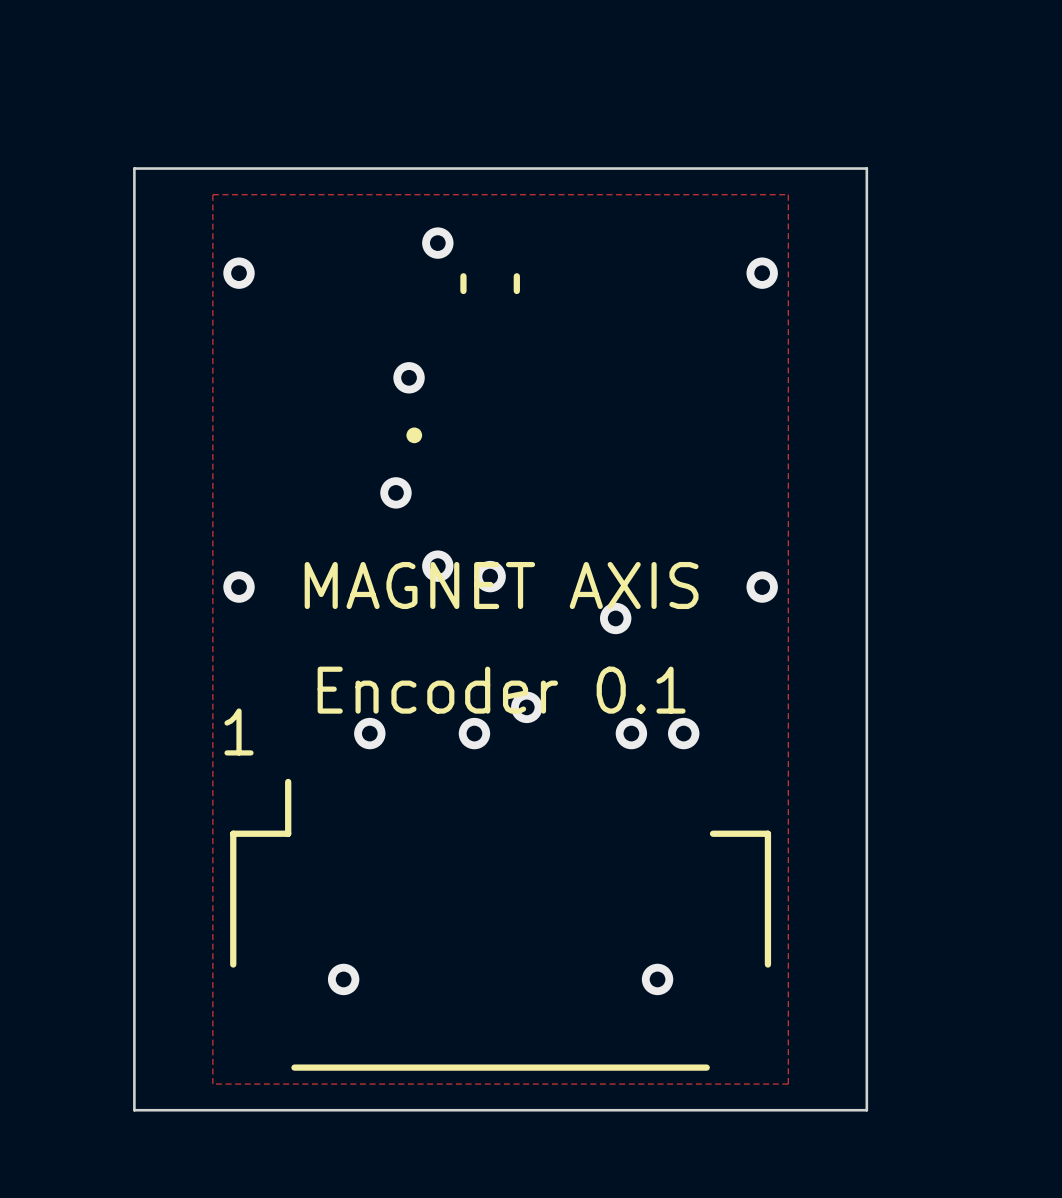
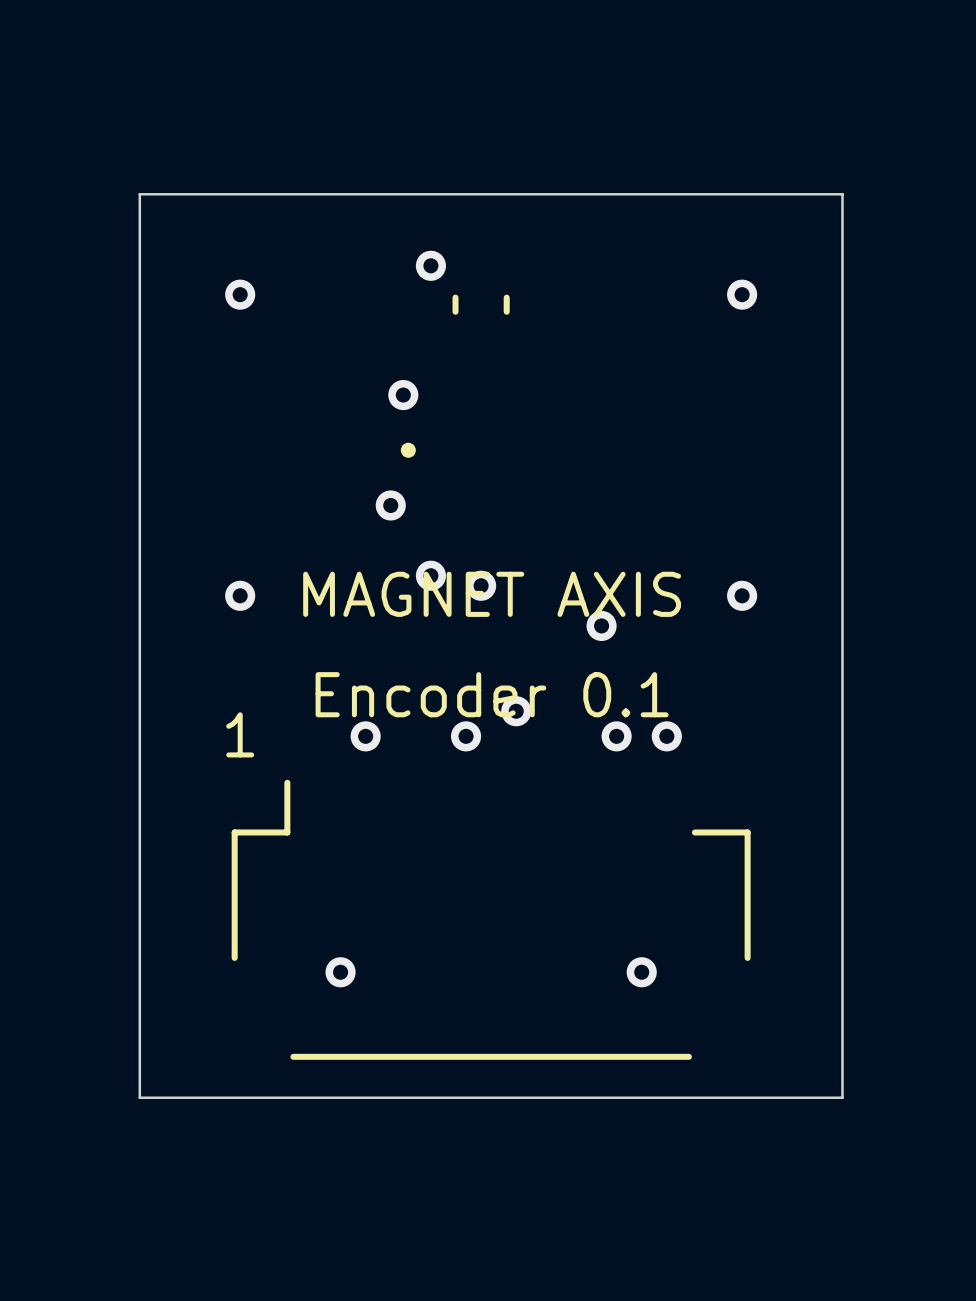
zone outline: (212, 194) (788, 194) (788, 1084) (212, 1084) (212, 194) -> none

